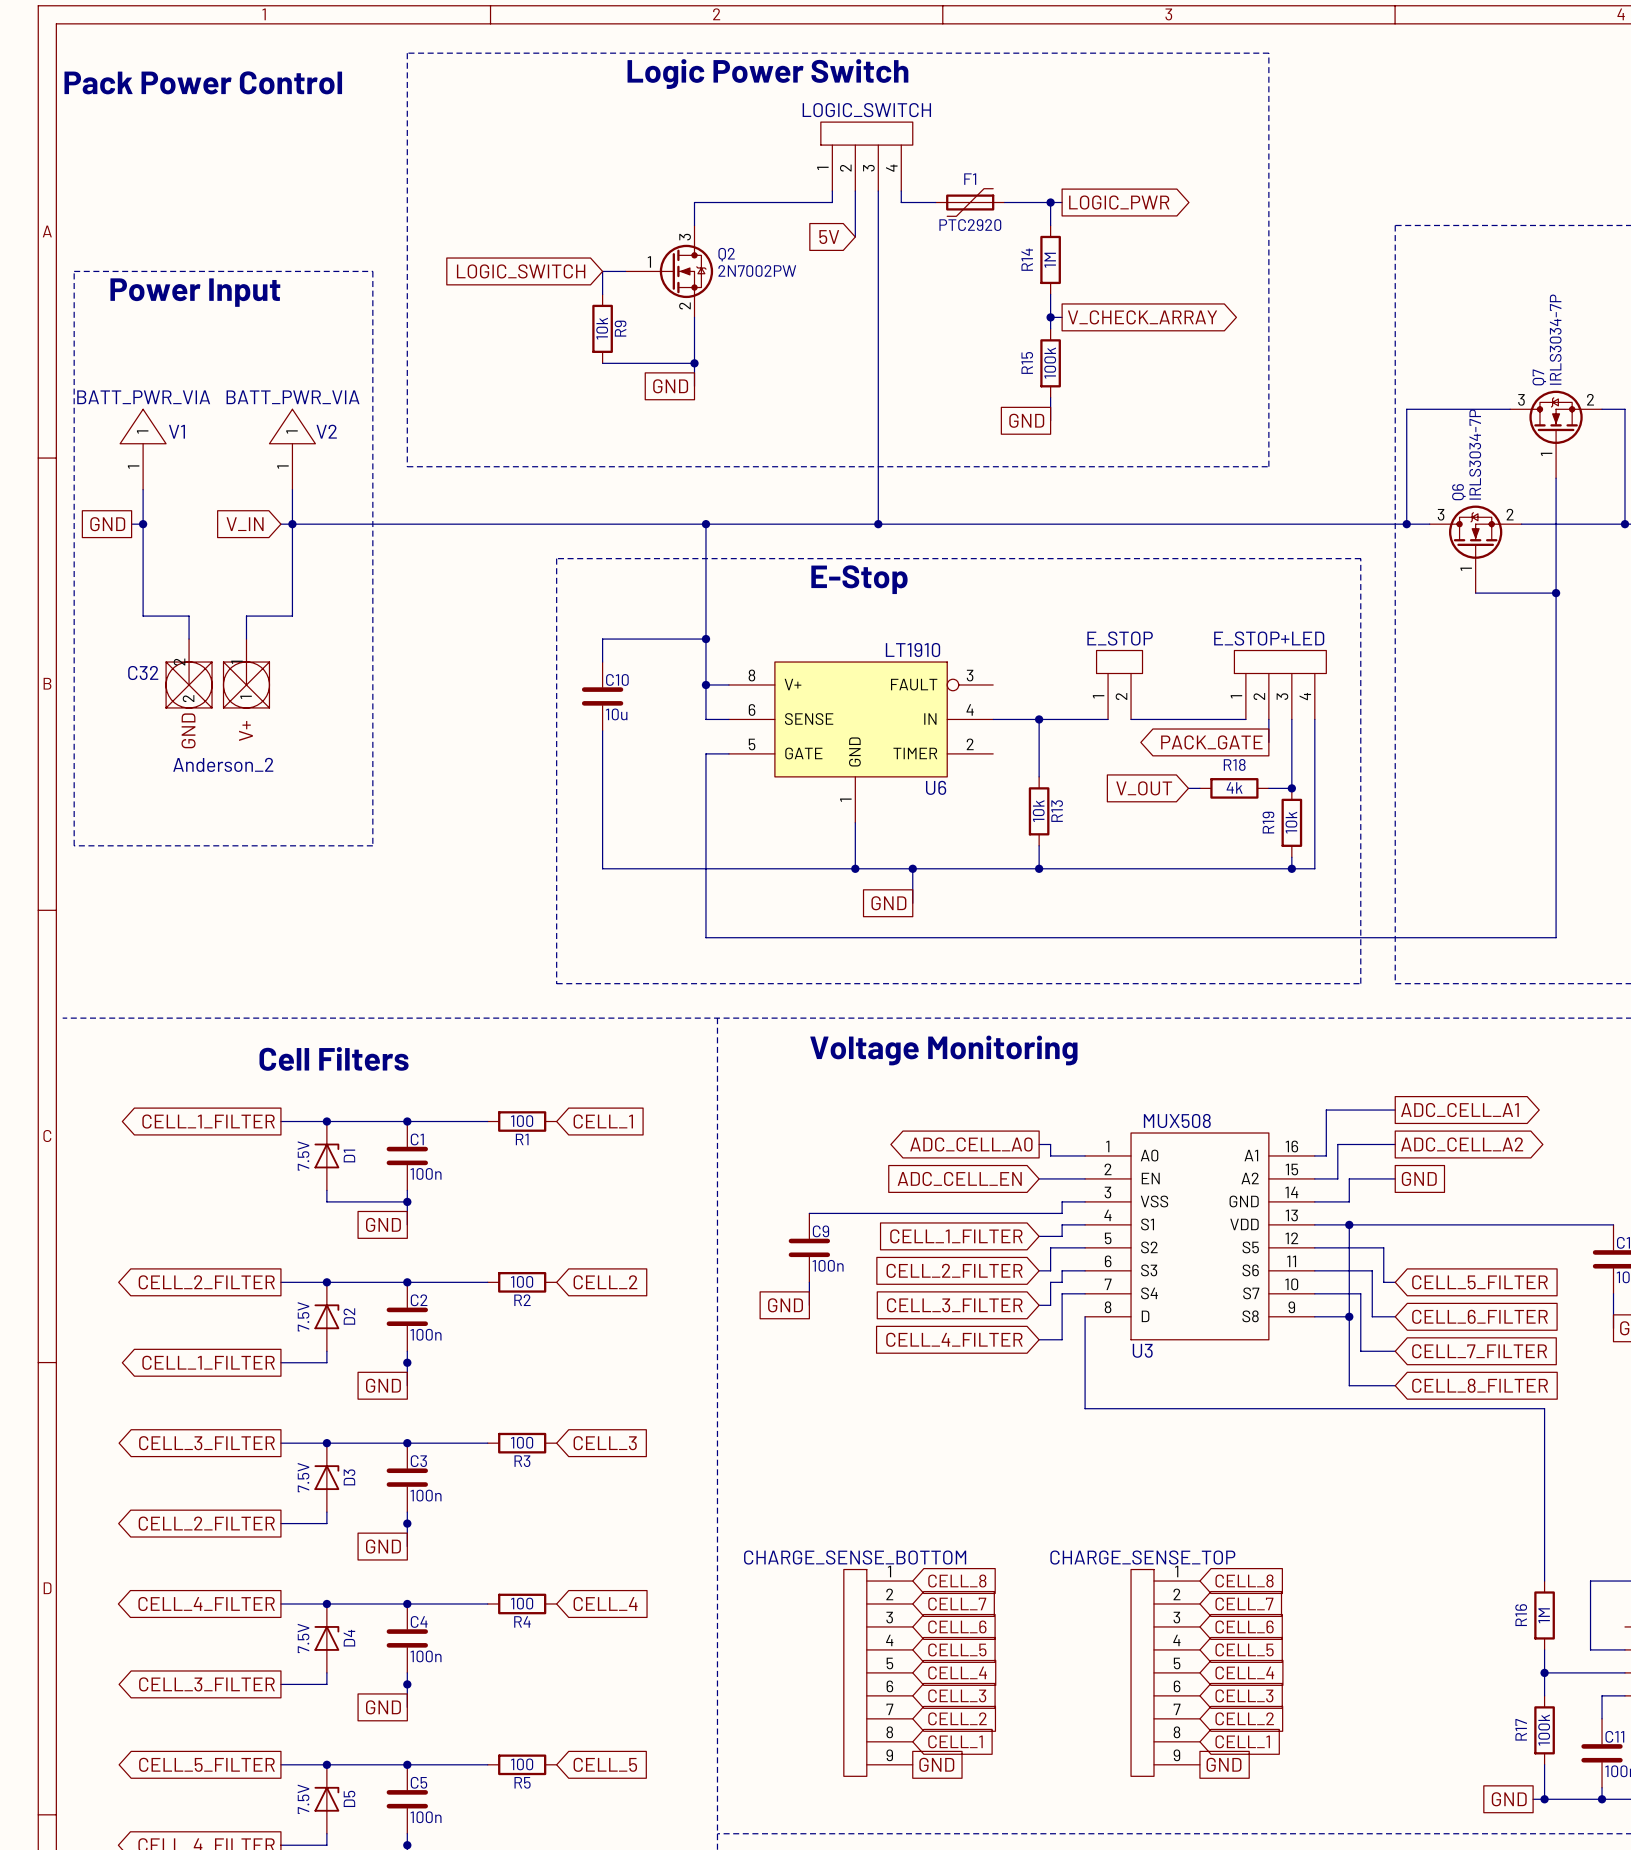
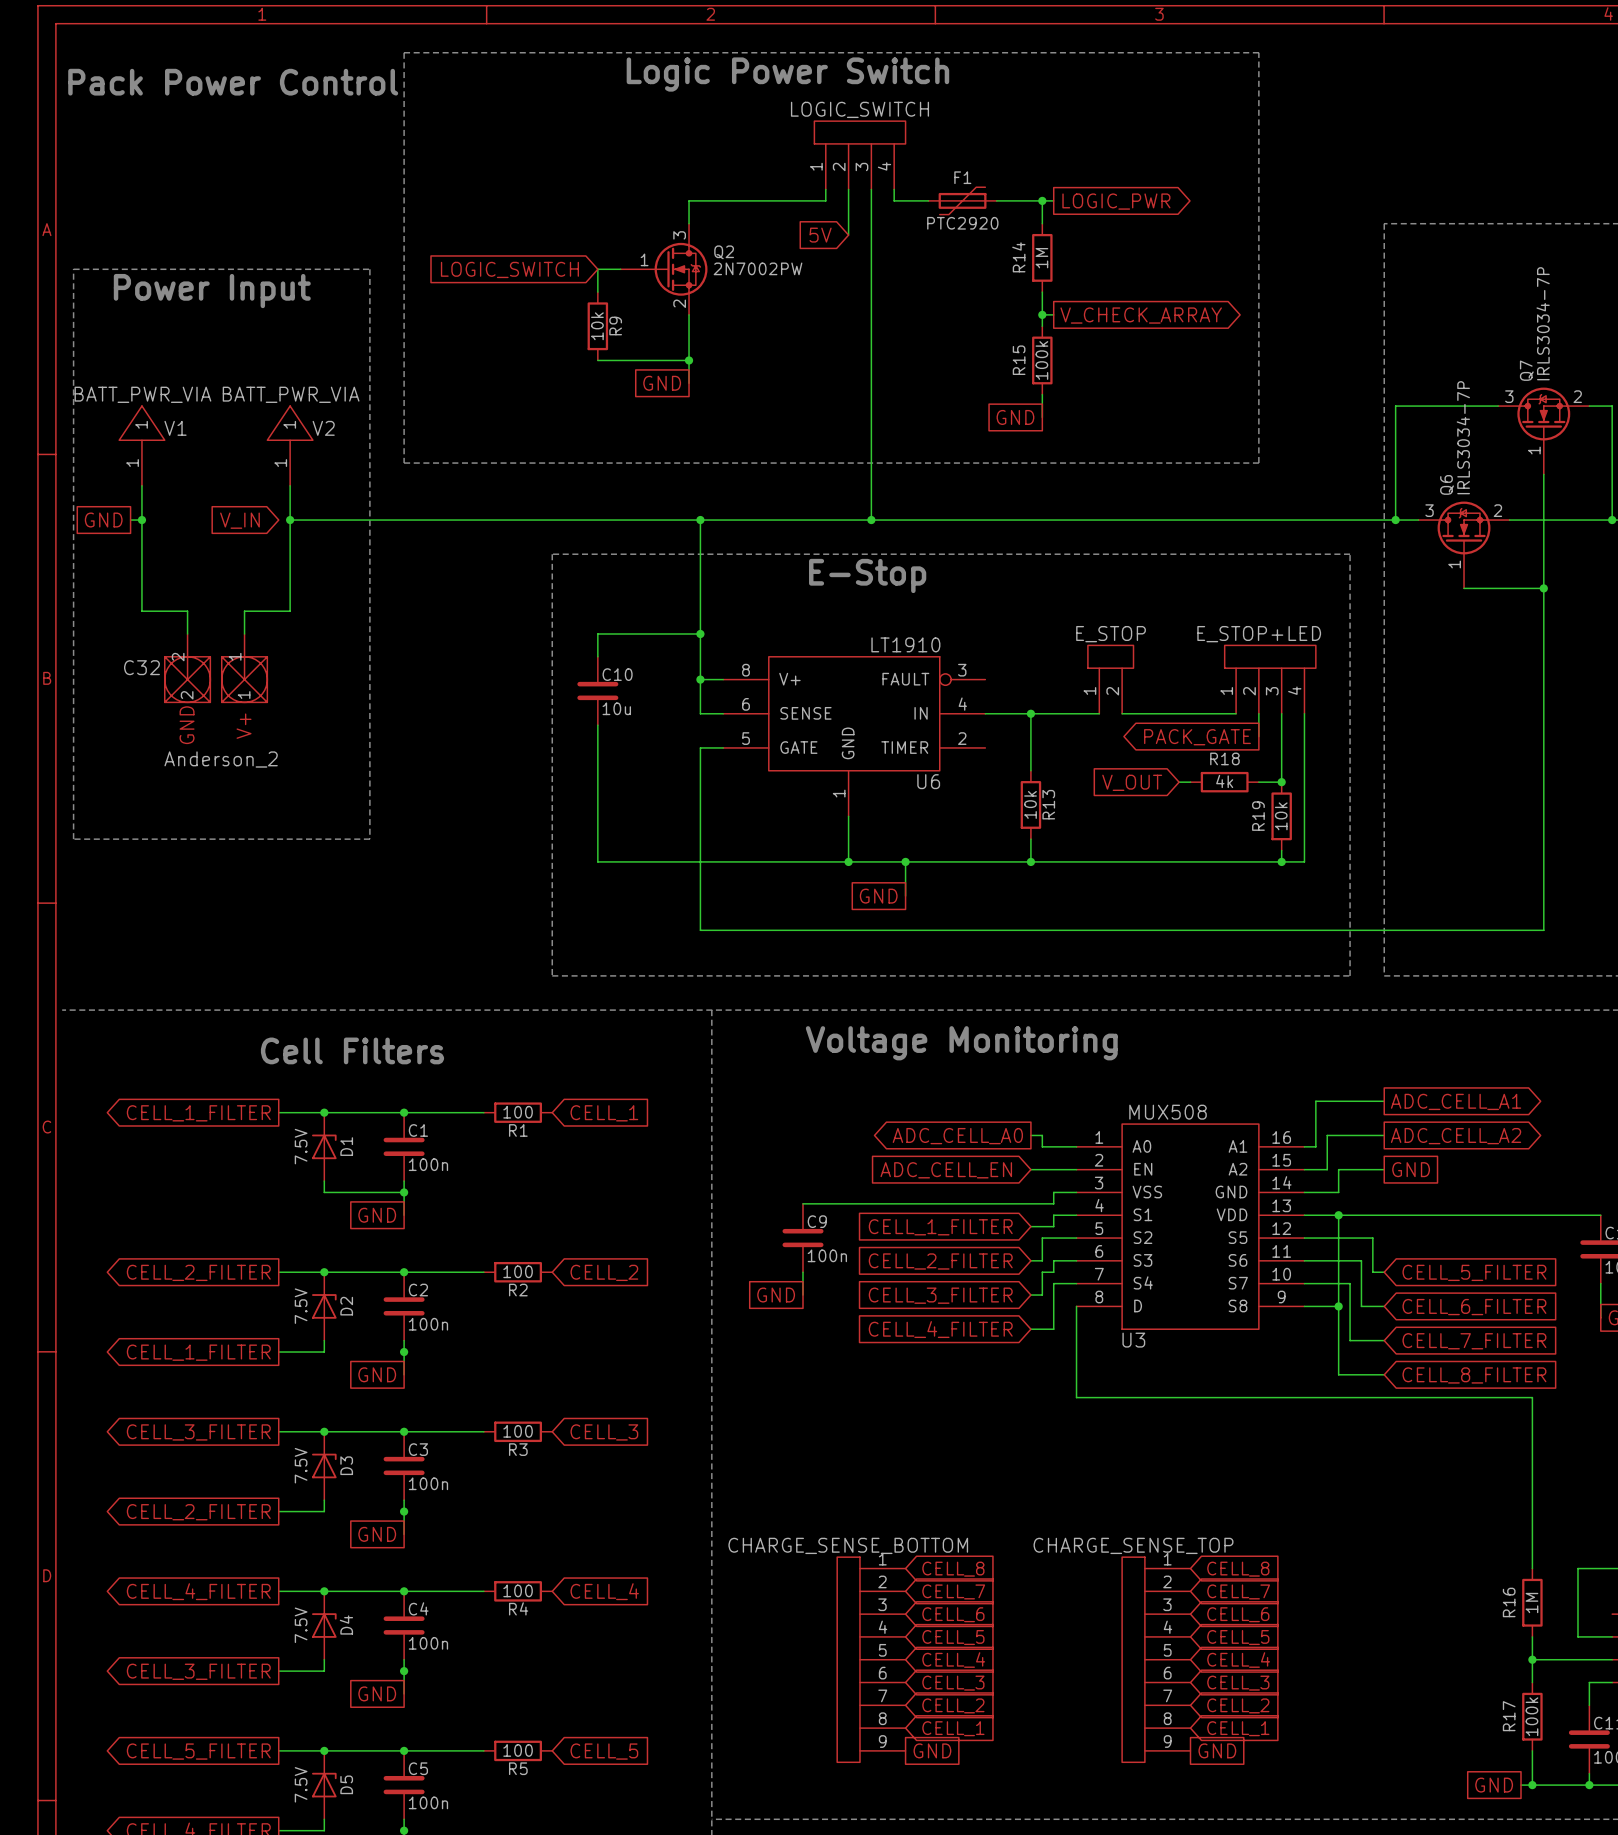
wire: (280, 524) (292, 524) -> none

